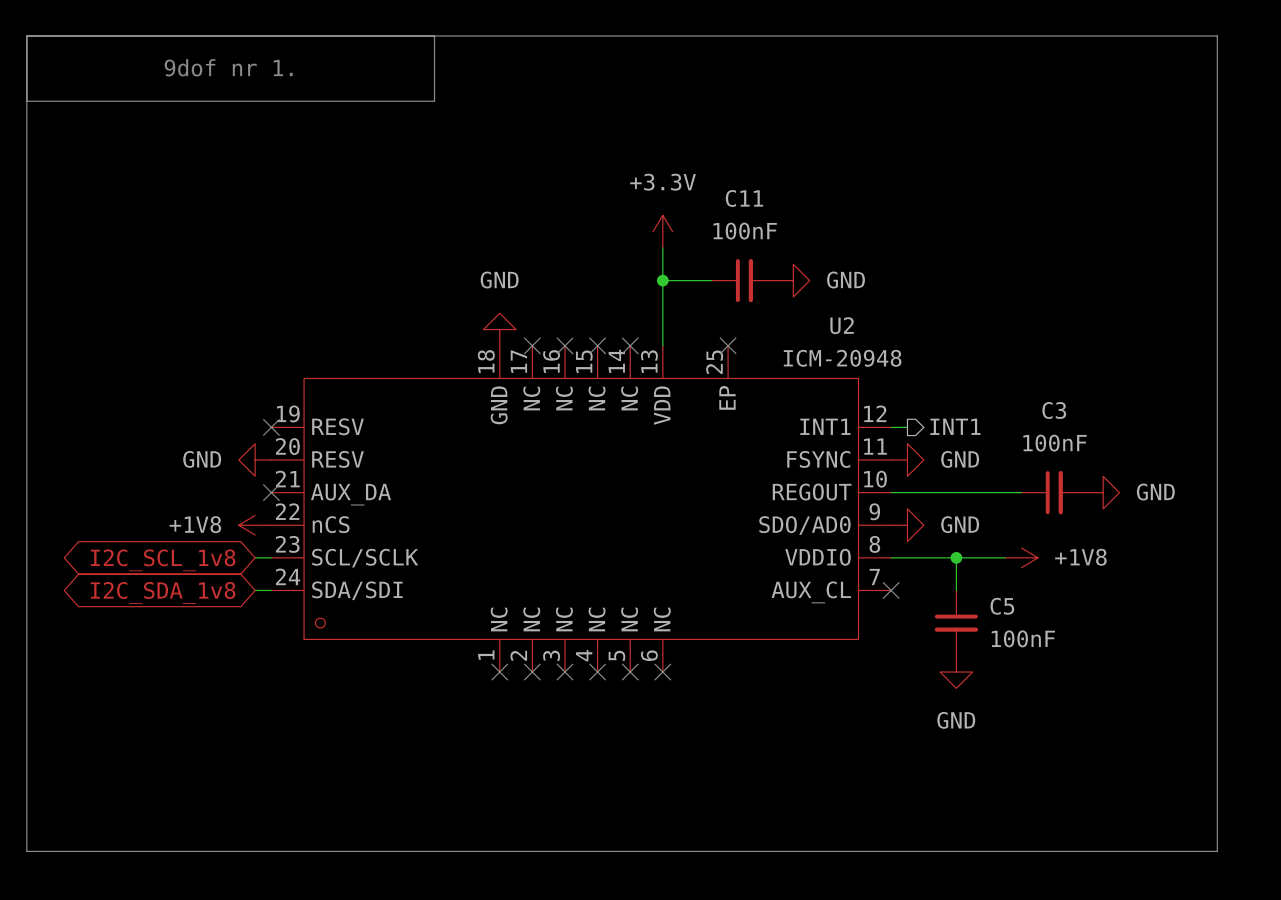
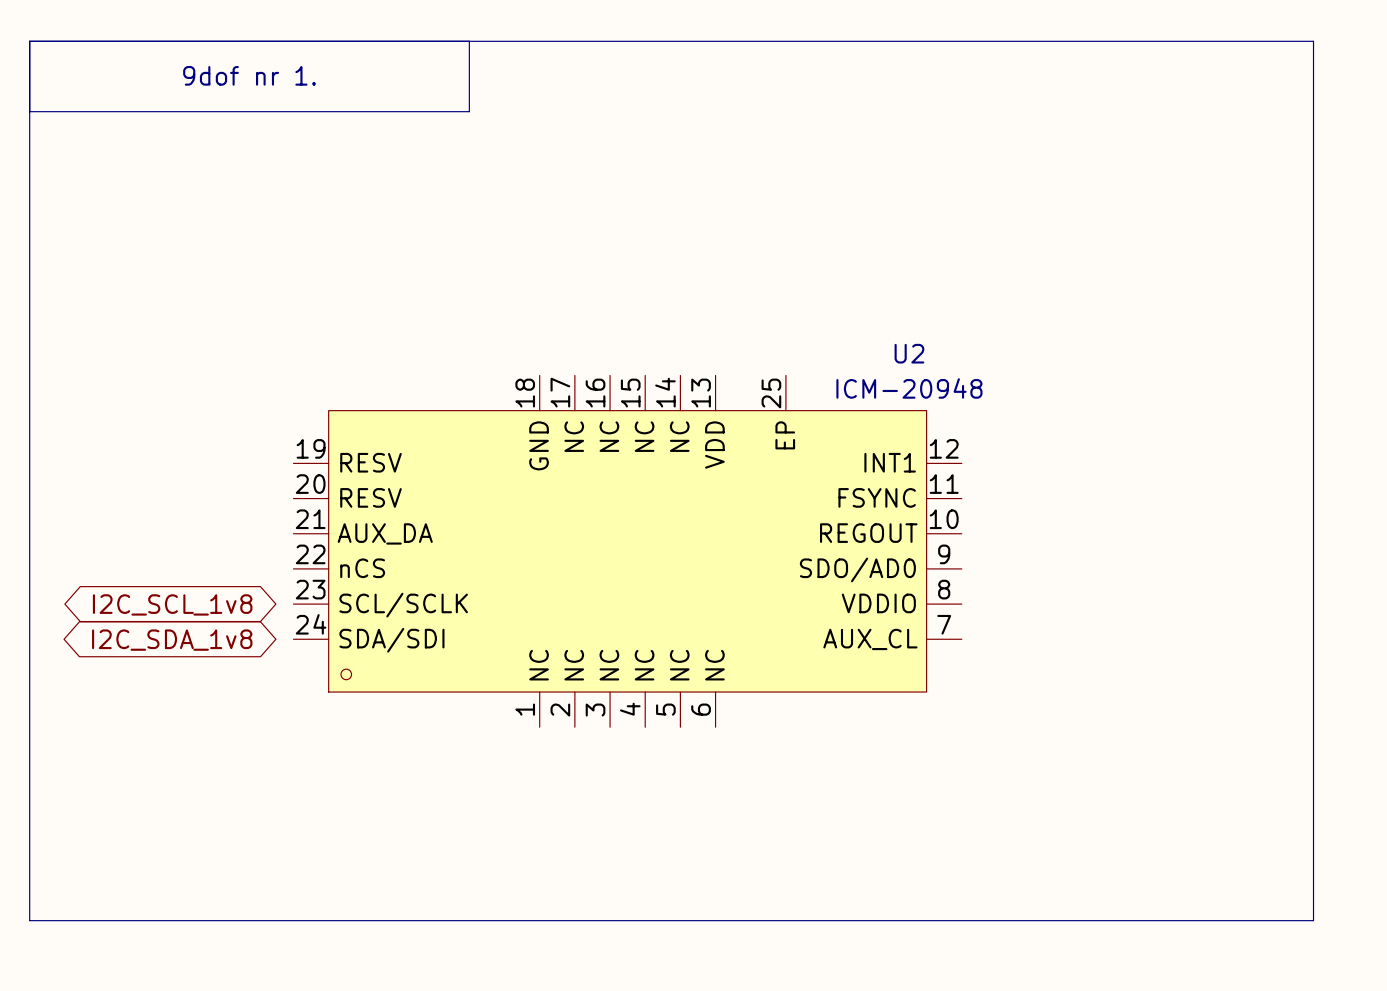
power symbol: +3.3V (662, 231) -> none
wire: (662, 248) (662, 345) -> none
wire: (662, 280) (711, 280) -> none
junction: (662, 280) -> none
C11: 100nF (744, 280) -> none
power symbol: GND (793, 280) -> none
power symbol: GND (499, 329) -> none
no-connect mark: (532, 345) -> none
no-connect mark: (564, 345) -> none
no-connect mark: (597, 345) -> none
no-connect mark: (630, 345) -> none
no-connect mark: (728, 345) -> none
hierarchical label: INT1 (955, 426) -> none
no-connect mark: (271, 427) -> none
wire: (891, 427) (907, 427) -> none
power symbol: GND (255, 460) -> none
power symbol: GND (907, 460) -> none
no-connect mark: (271, 492) -> none
wire: (891, 492) (1021, 492) -> none
C3: 100nF (1054, 492) -> none
power symbol: GND (1103, 492) -> none
power symbol: +1V8 (255, 525) -> none
power symbol: GND (907, 525) -> none
wire: (255, 557) (271, 557) -> none
wire: (891, 557) (1005, 557) -> none
wire: (956, 557) (956, 590) -> none
junction: (956, 557) -> none
power symbol: +1V8 (1021, 557) -> none
wire: (255, 590) (271, 590) -> none
no-connect mark: (891, 590) -> none
C5: 100nF (956, 623) -> none
no-connect mark: (499, 672) -> none
no-connect mark: (532, 672) -> none
no-connect mark: (564, 672) -> none
no-connect mark: (597, 672) -> none
no-connect mark: (630, 672) -> none
no-connect mark: (662, 672) -> none
power symbol: GND (956, 672) -> none

